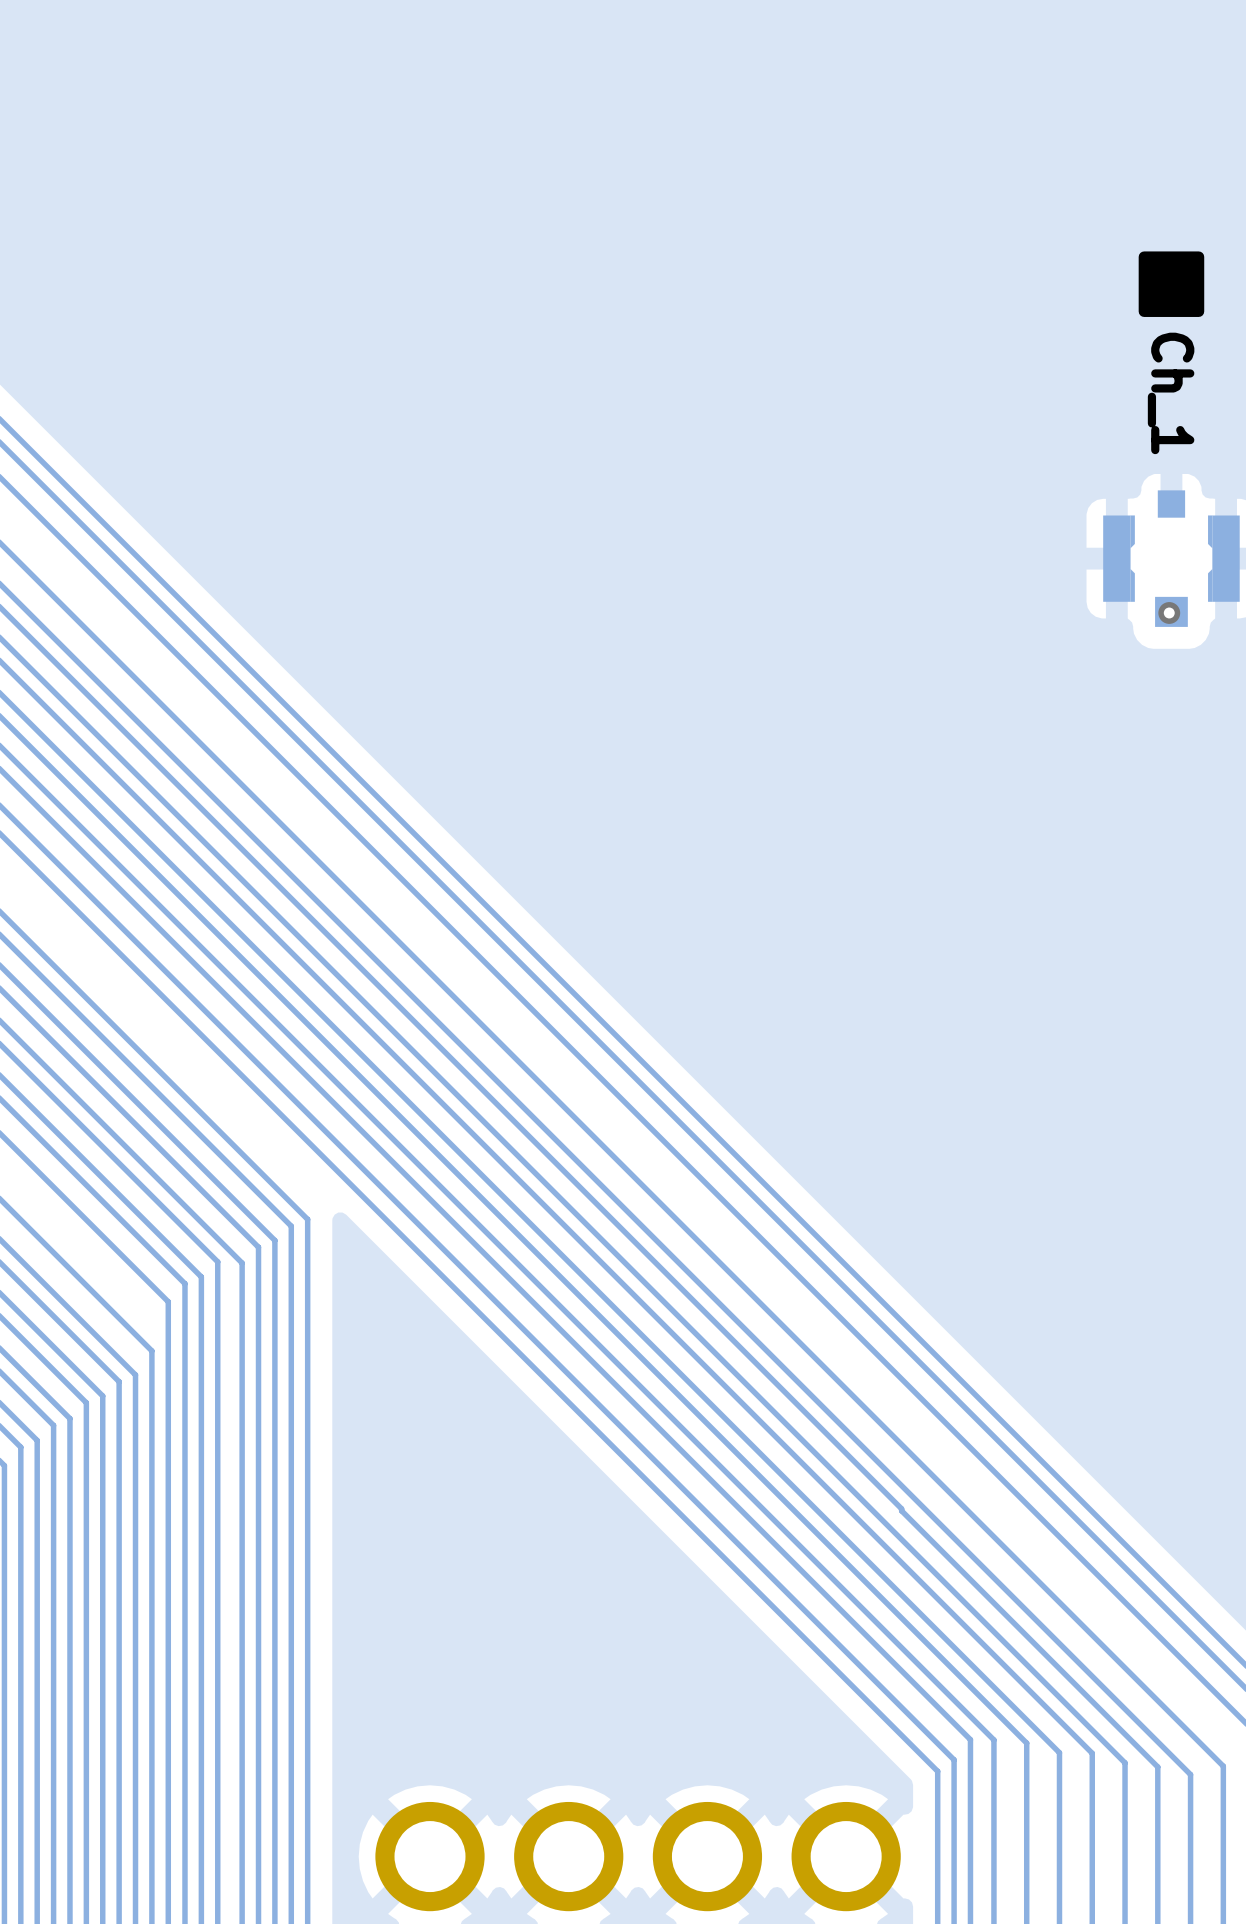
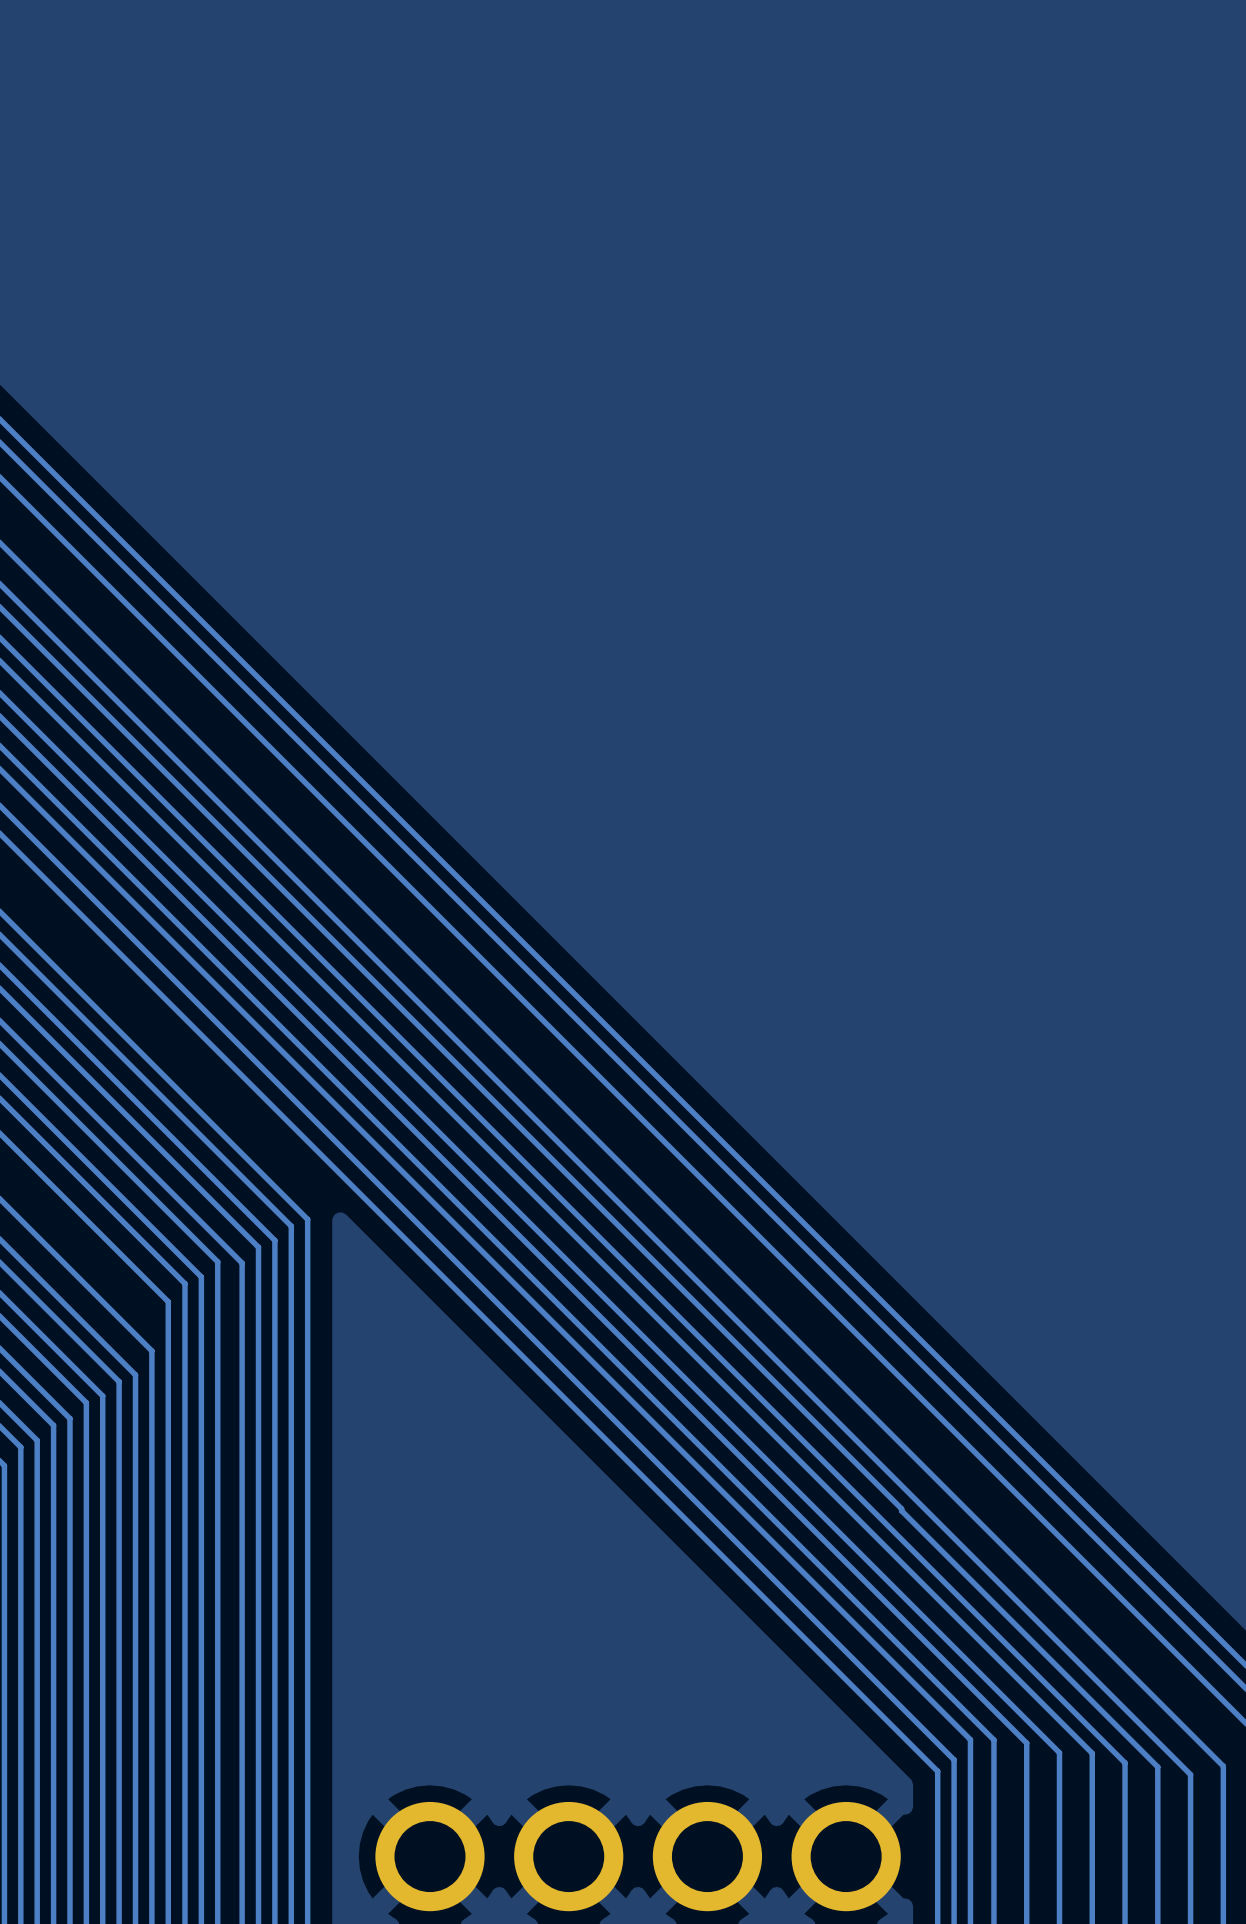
drawing: [1138, 251, 1205, 317] -> none
Ch_1: (1171, 558) -> none
via: (1169, 612) -> none

